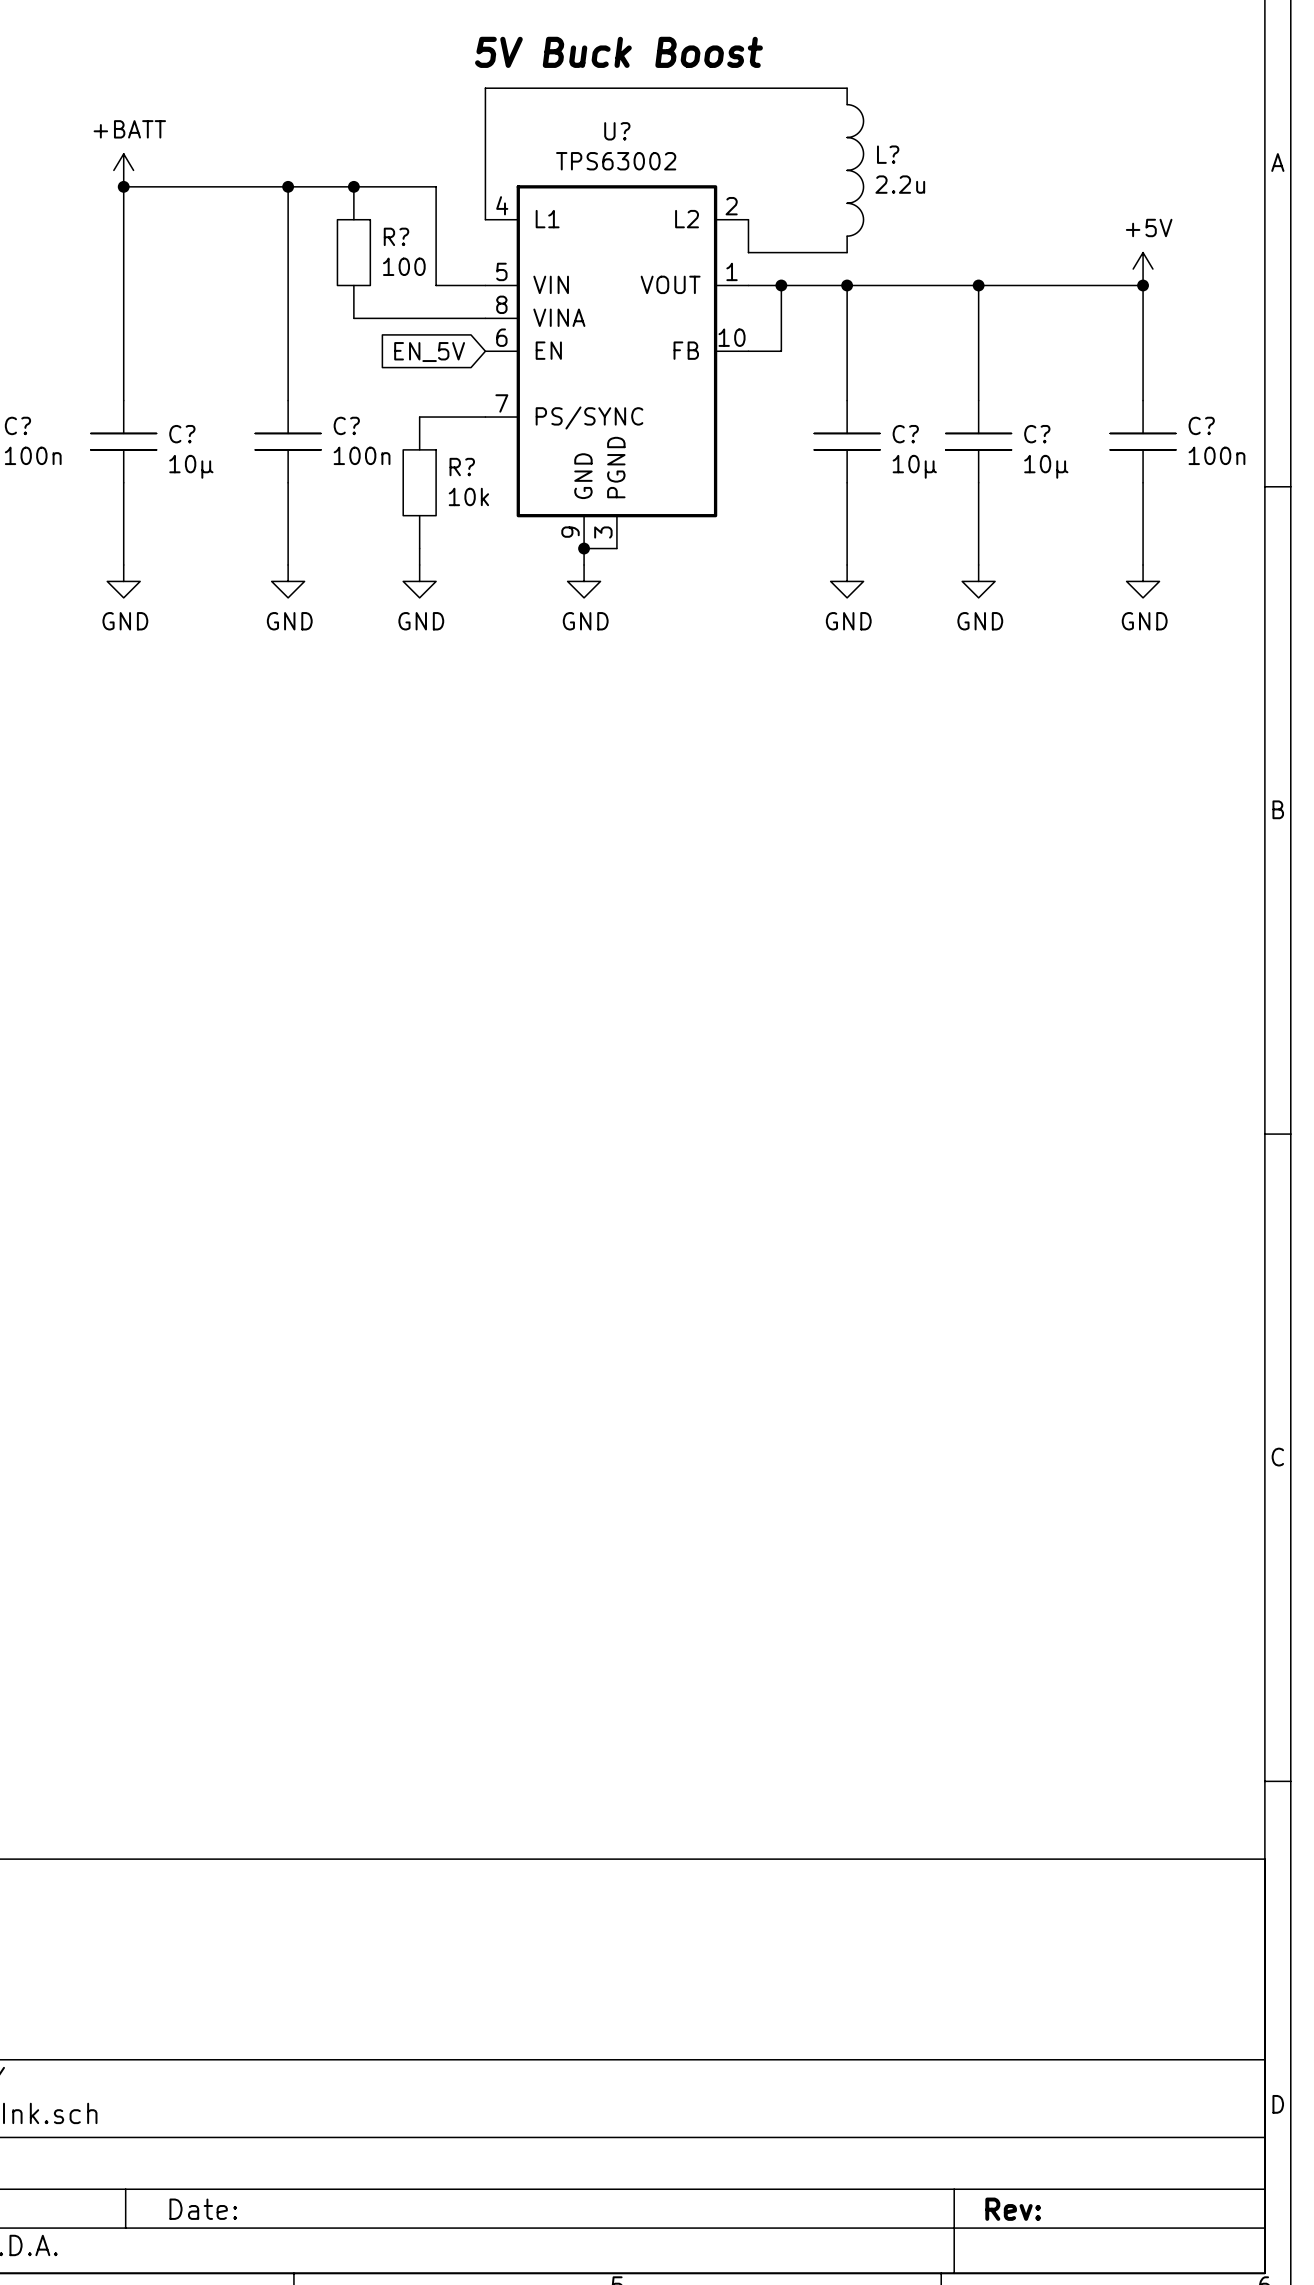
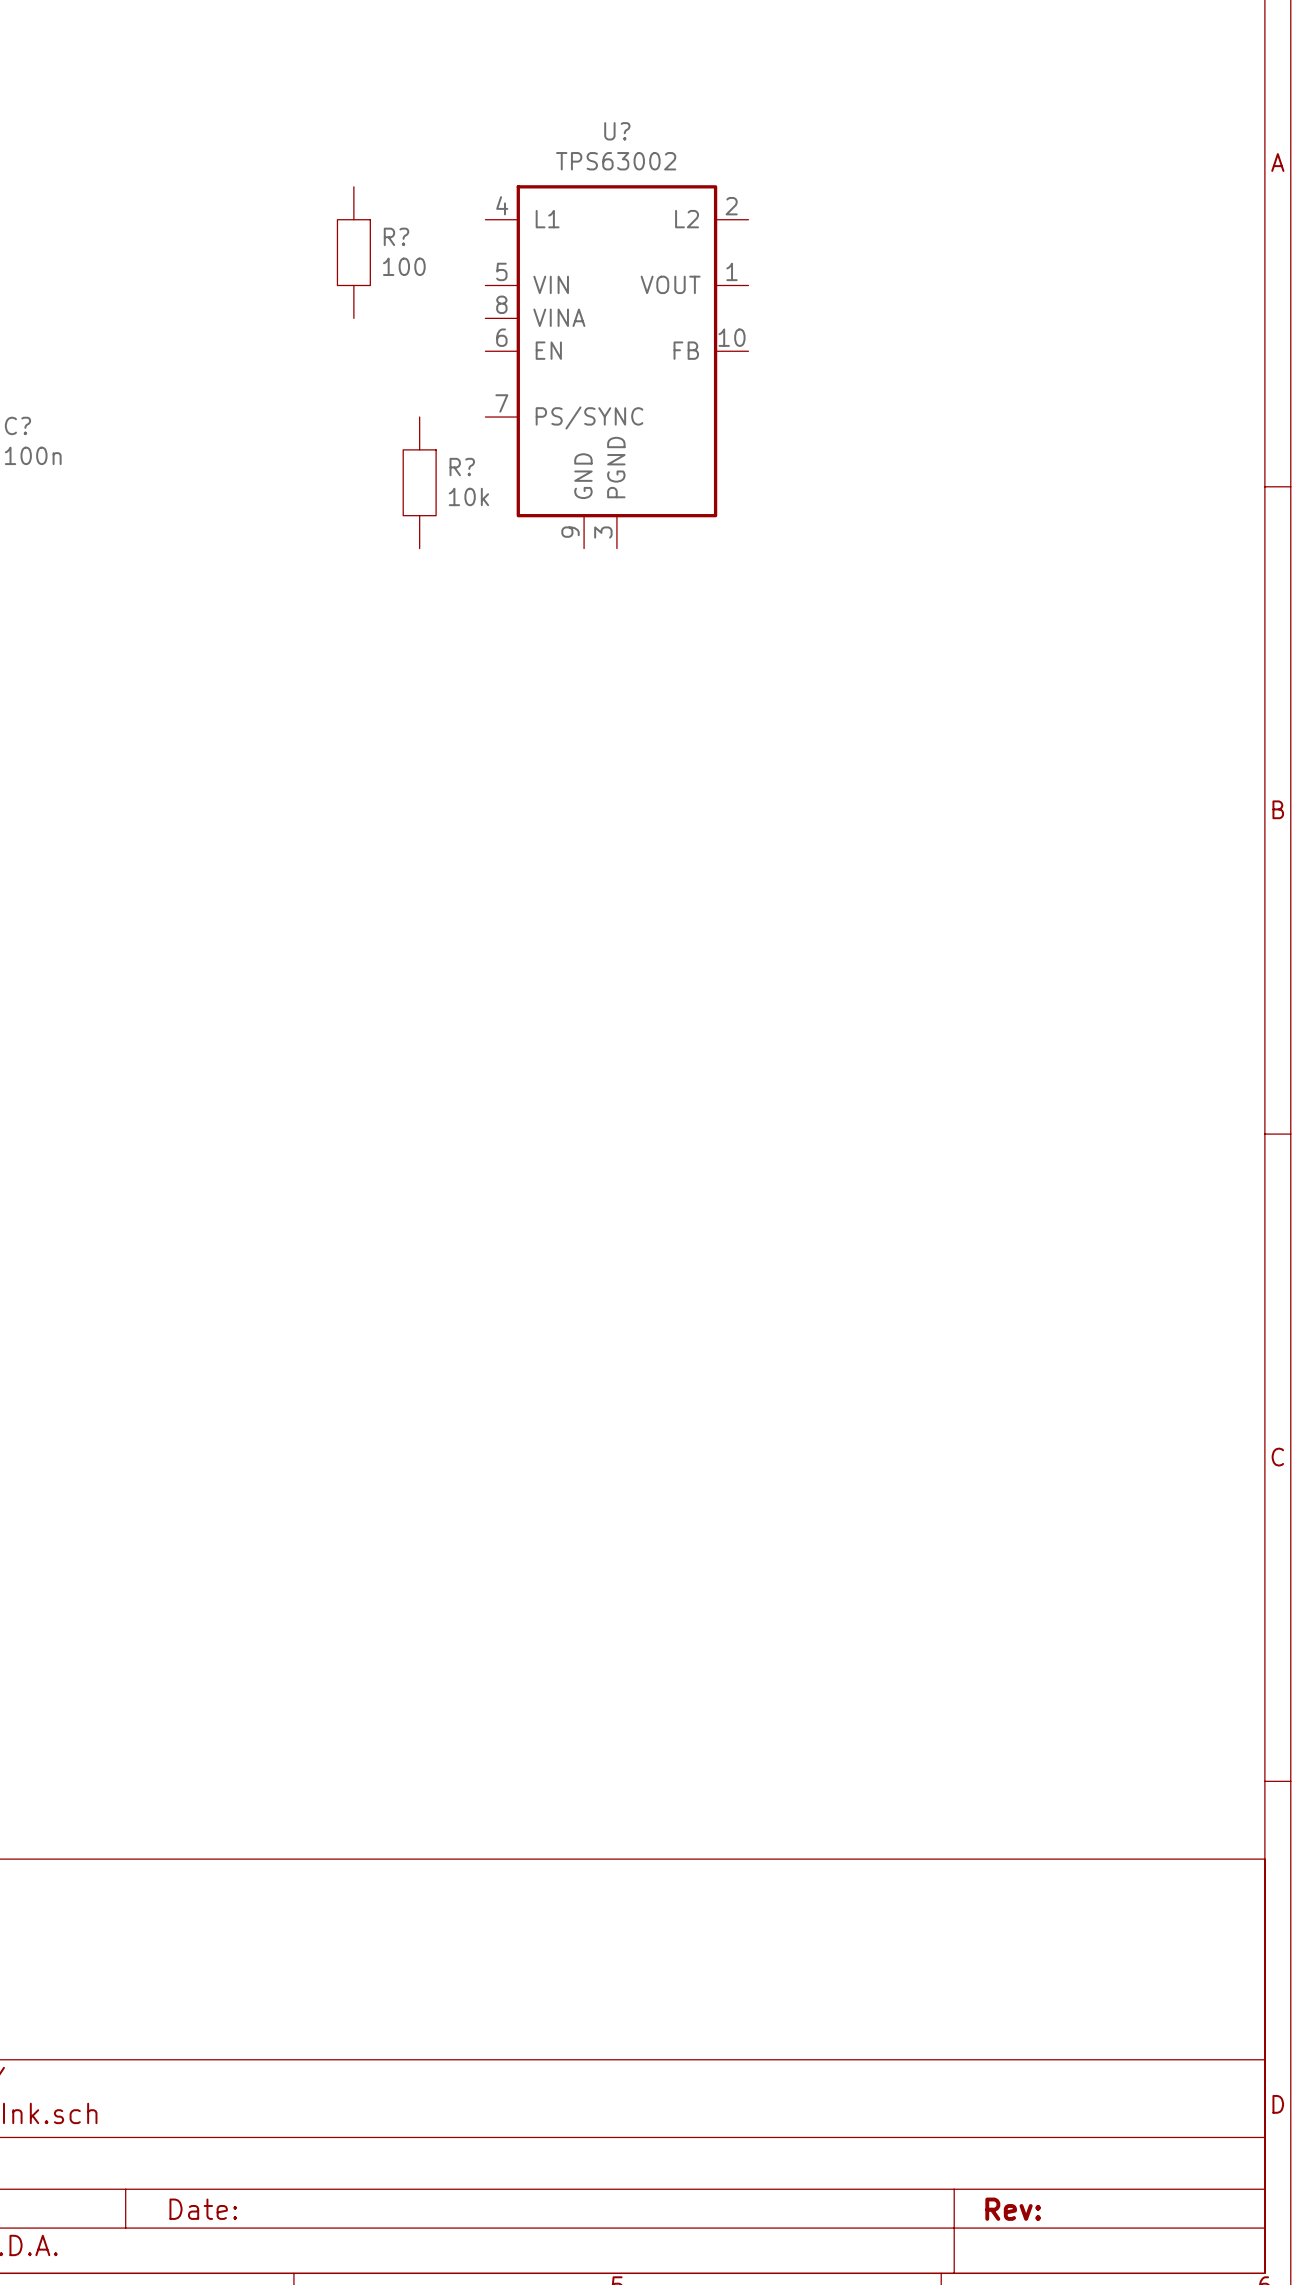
text: 5V Buck Boost (618, 52) -> none
wire: (847, 88) (485, 88) (485, 219) -> none
power symbol: +BATT (123, 170) -> none
L?: 2.2u (855, 170) -> none
junction: (123, 186) -> none
wire: (288, 186) (288, 400) -> none
junction: (288, 186) -> none
junction: (353, 186) -> none
wire: (748, 219) (748, 252) (847, 252) -> none
power symbol: +5V (1143, 269) -> none
wire: (485, 285) (436, 285) (436, 186) (123, 186) (123, 400) -> none
wire: (748, 285) (1143, 285) (1143, 400) -> none
wire: (781, 285) (781, 351) (748, 351) -> none
junction: (781, 285) -> none
wire: (847, 285) (847, 400) -> none
junction: (847, 285) -> none
wire: (978, 285) (978, 400) -> none
junction: (978, 285) -> none
junction: (1143, 285) -> none
wire: (353, 318) (485, 318) -> none
global label: EN_5V (429, 352) -> none
wire: (419, 417) (485, 417) -> none
C?: 10µ (123, 441) -> none
C?: 100n (288, 441) -> none
C?: 10µ (847, 441) -> none
C?: 10µ (978, 441) -> none
C?: 100n (1143, 441) -> none
wire: (123, 482) (123, 564) -> none
wire: (288, 482) (288, 564) -> none
wire: (847, 482) (847, 564) -> none
wire: (978, 482) (978, 564) -> none
wire: (1143, 482) (1143, 564) -> none
wire: (419, 548) (419, 564) -> none
junction: (584, 548) -> none
wire: (616, 548) (584, 548) (584, 564) -> none
power symbol: GND (123, 581) -> none
power symbol: GND (288, 581) -> none
power symbol: GND (419, 581) -> none
power symbol: GND (584, 581) -> none
power symbol: GND (847, 581) -> none
power symbol: GND (978, 581) -> none
power symbol: GND (1143, 581) -> none

